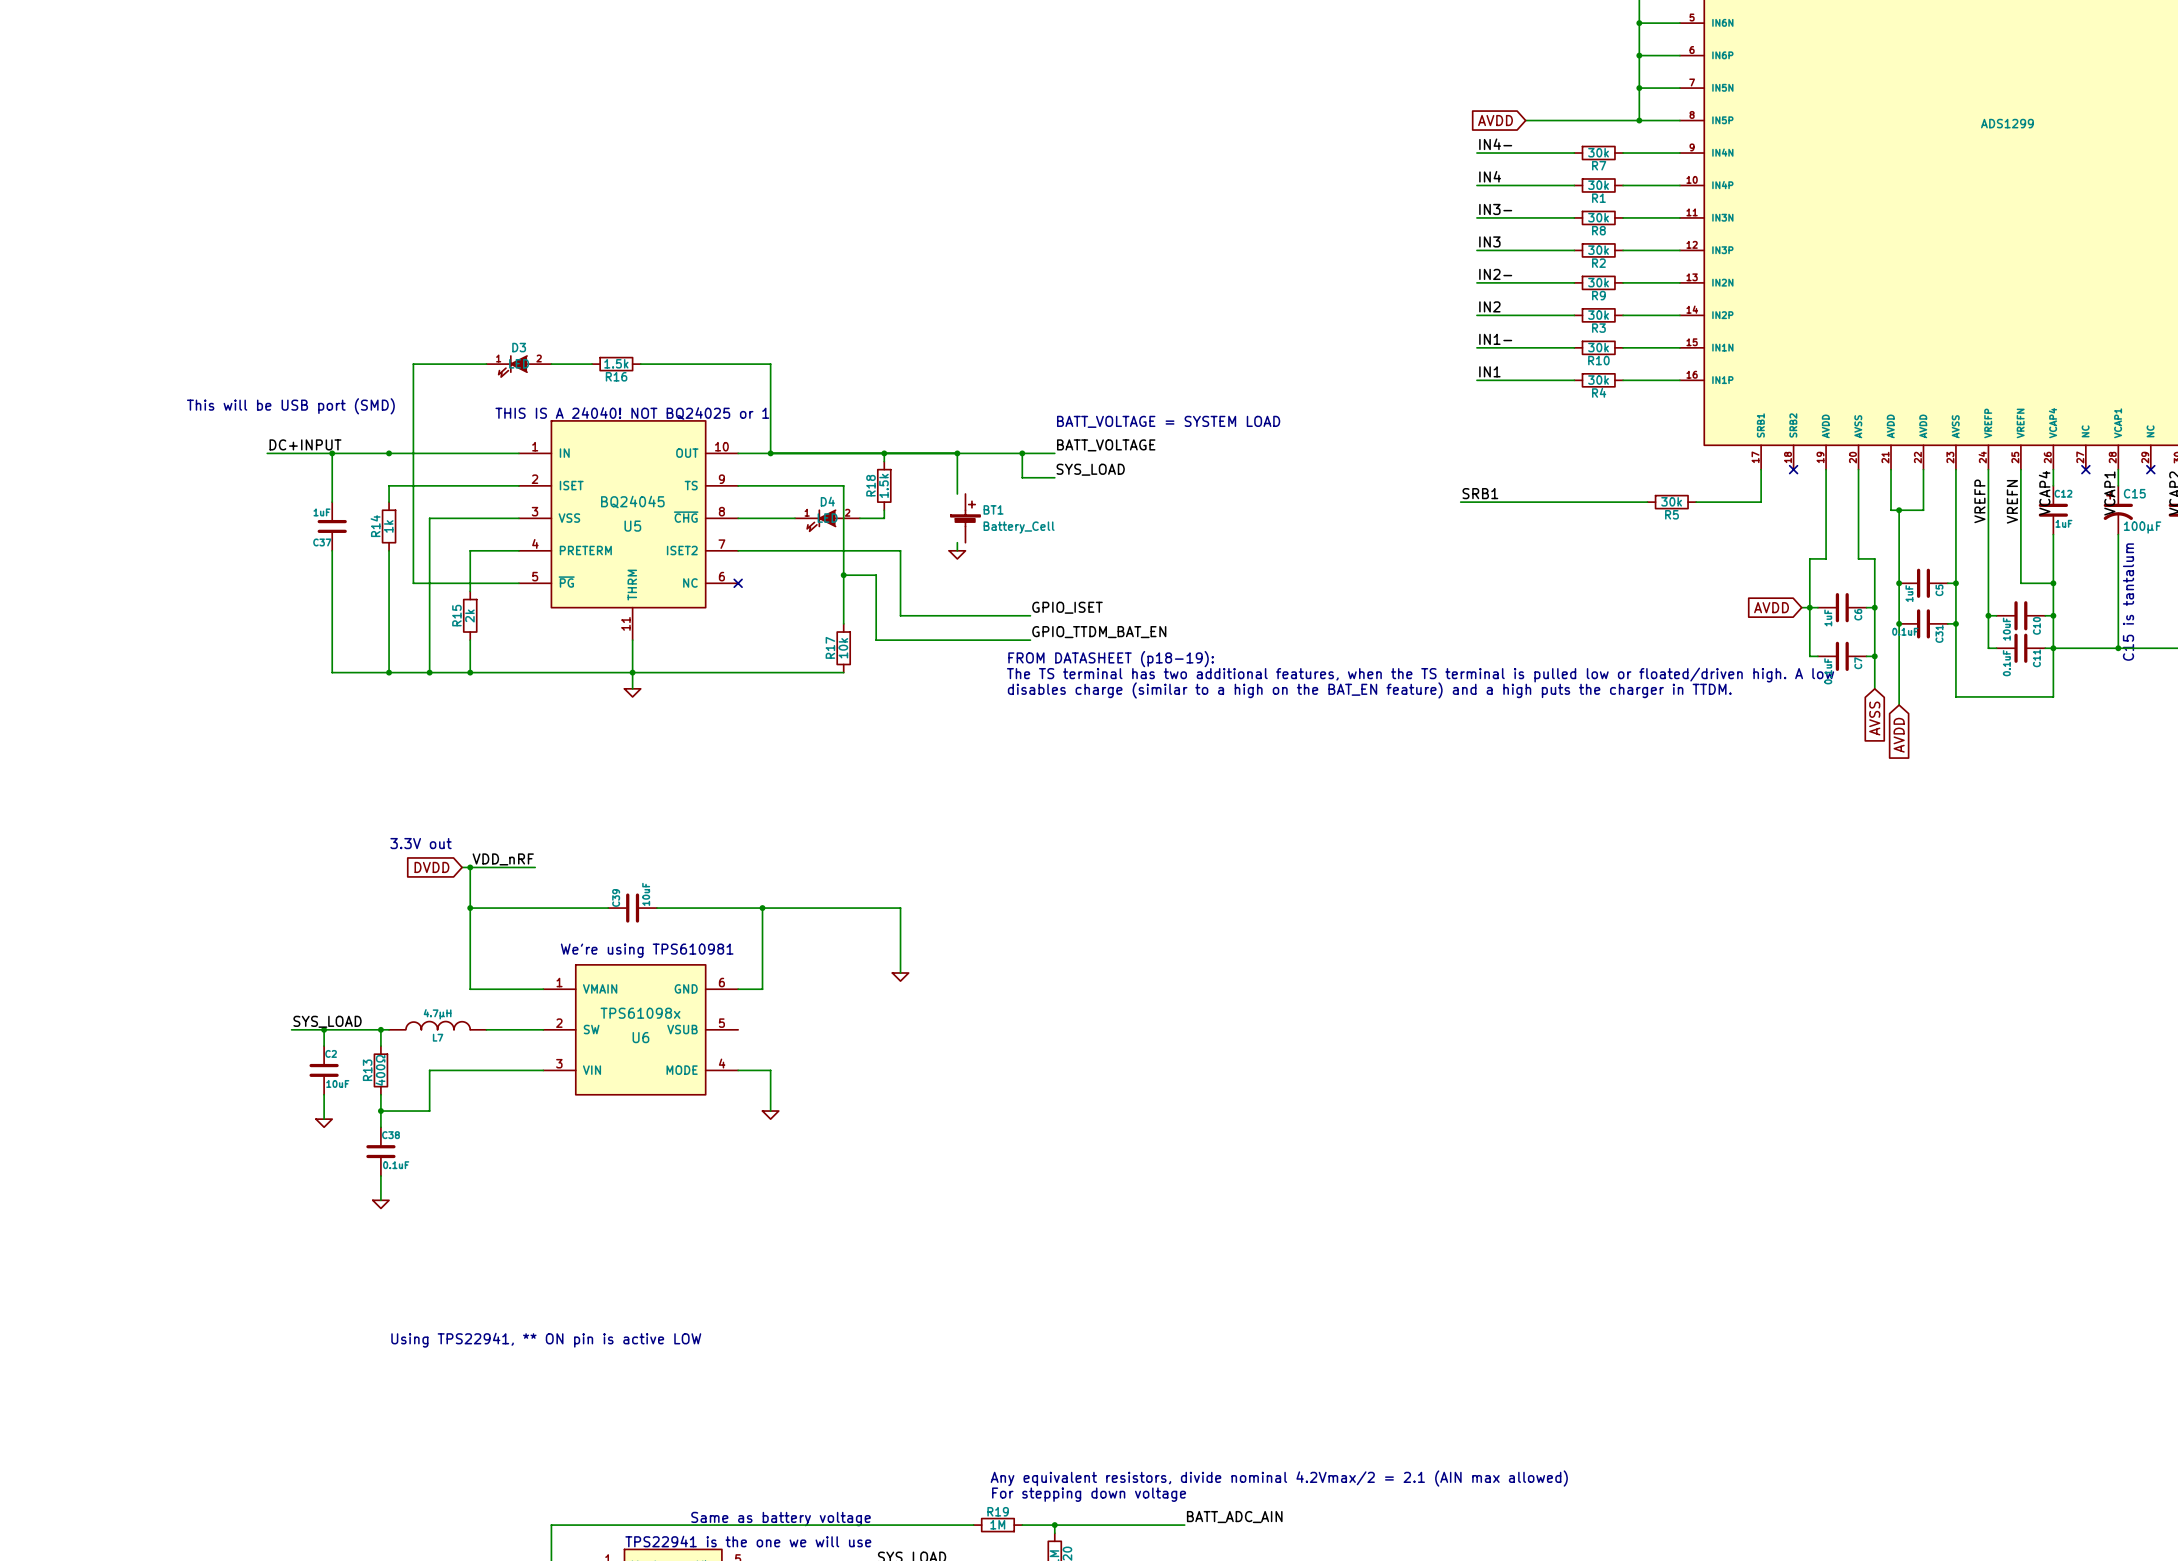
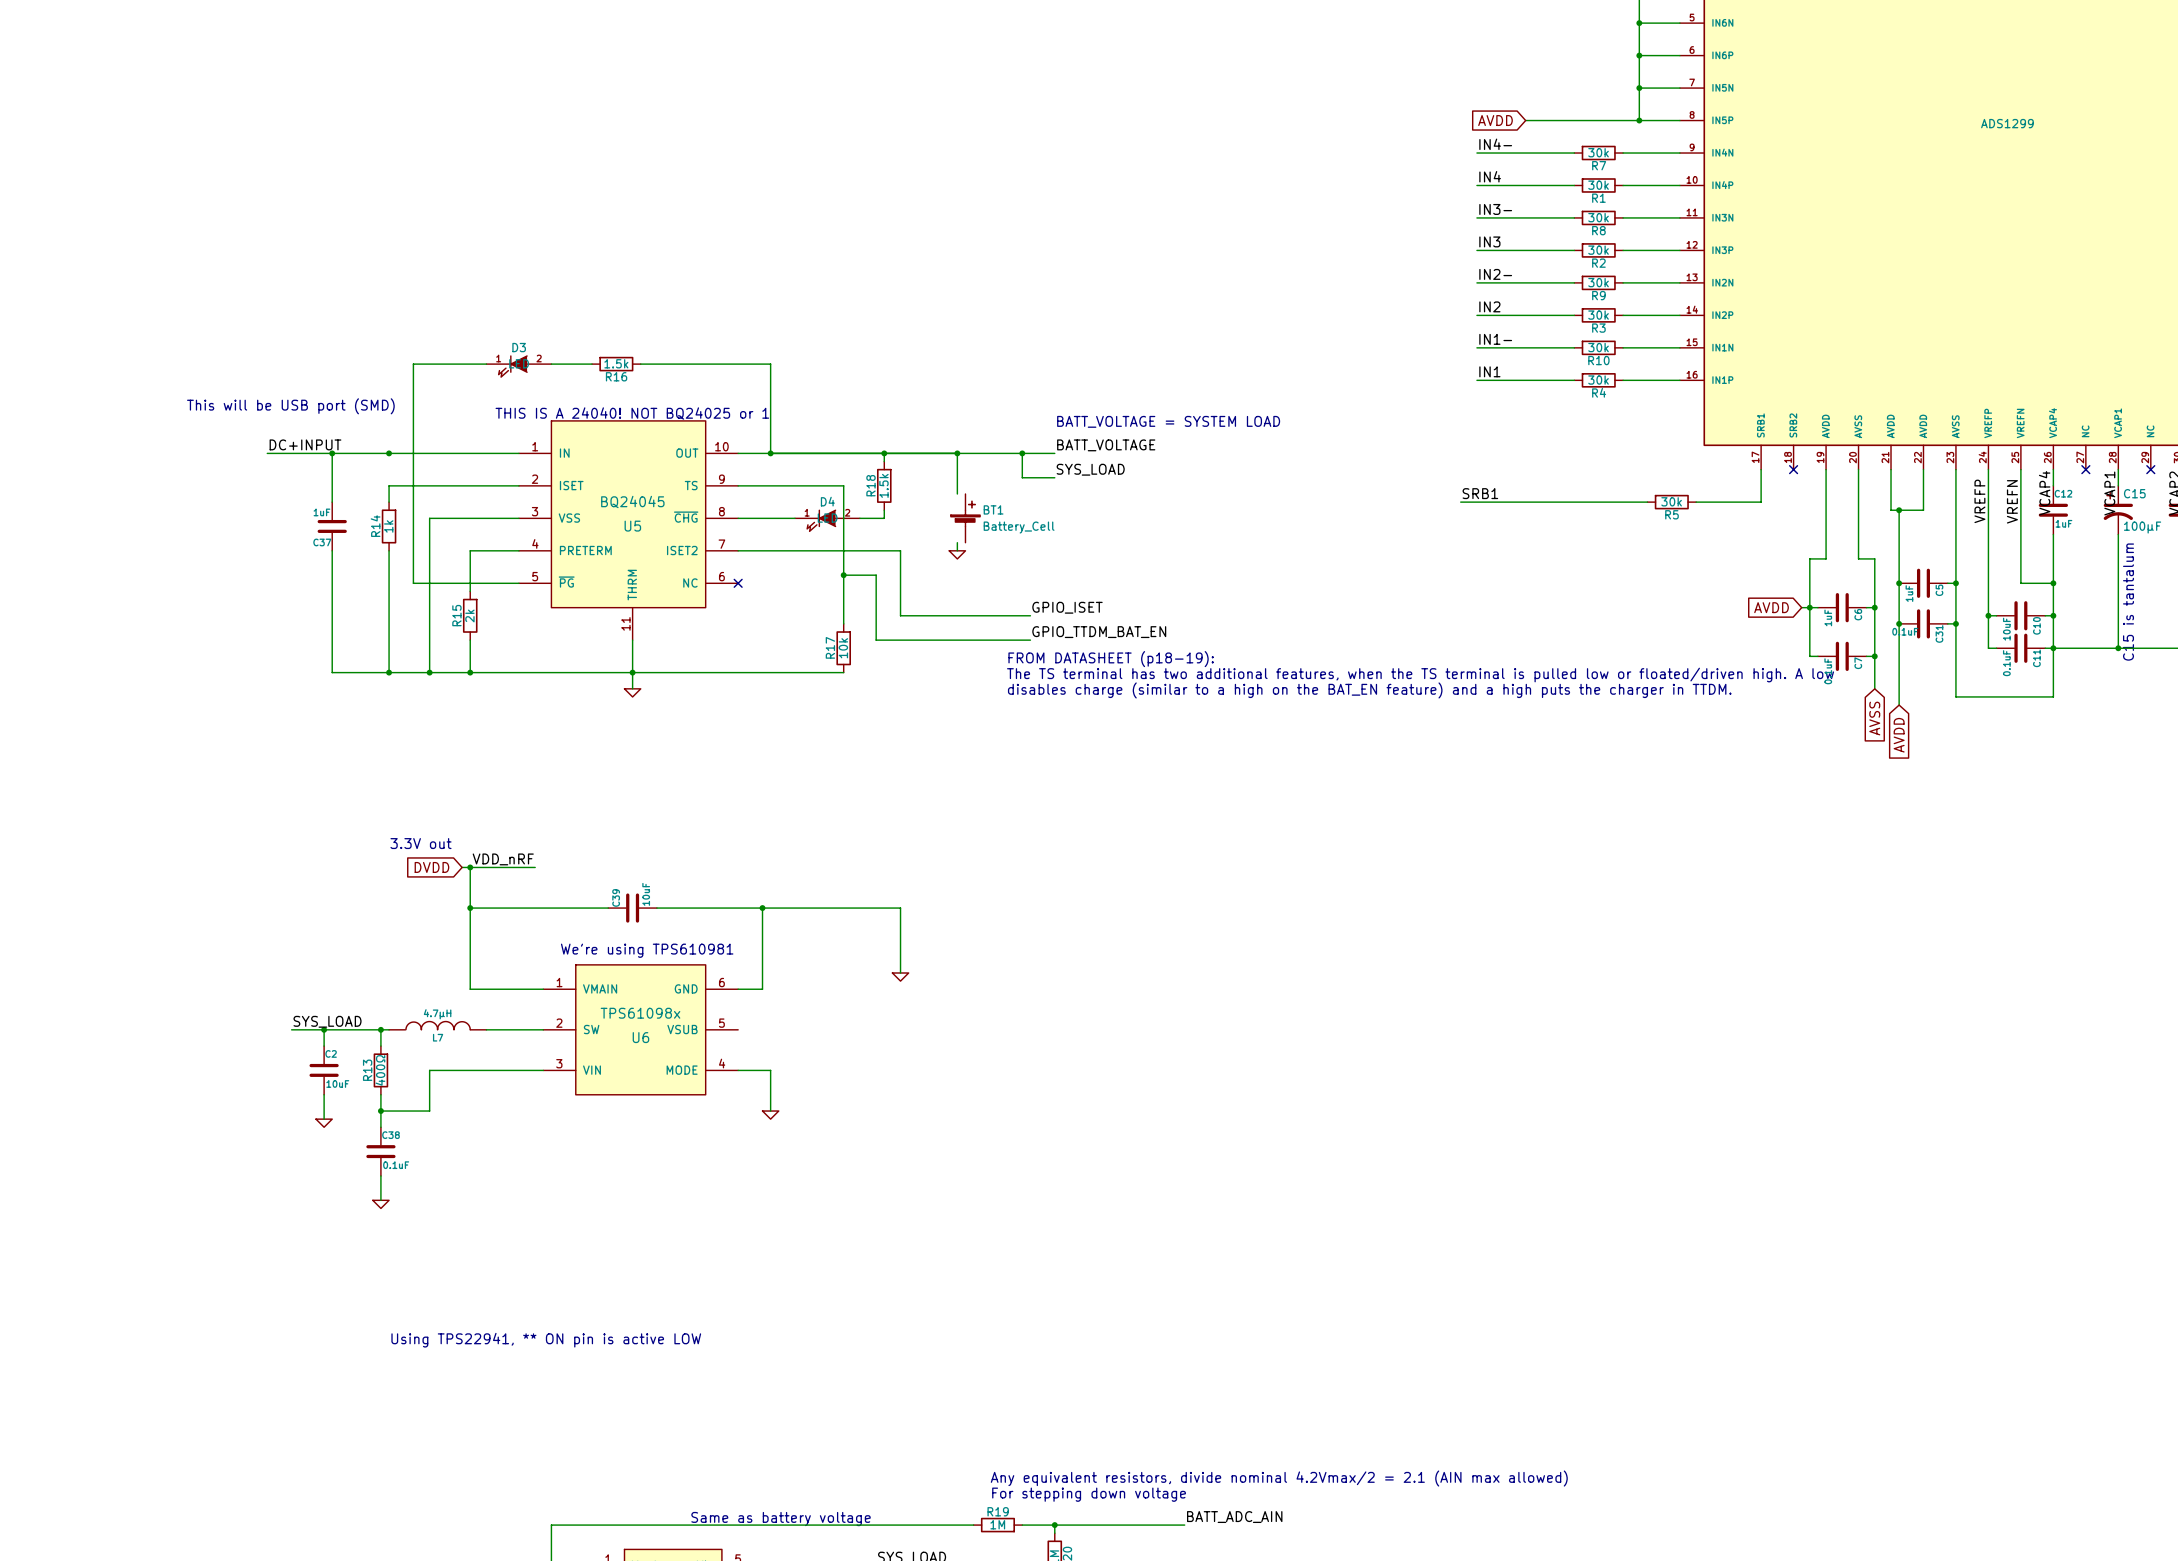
text: TPS22941 is the one we will use (748, 1541) -> none

